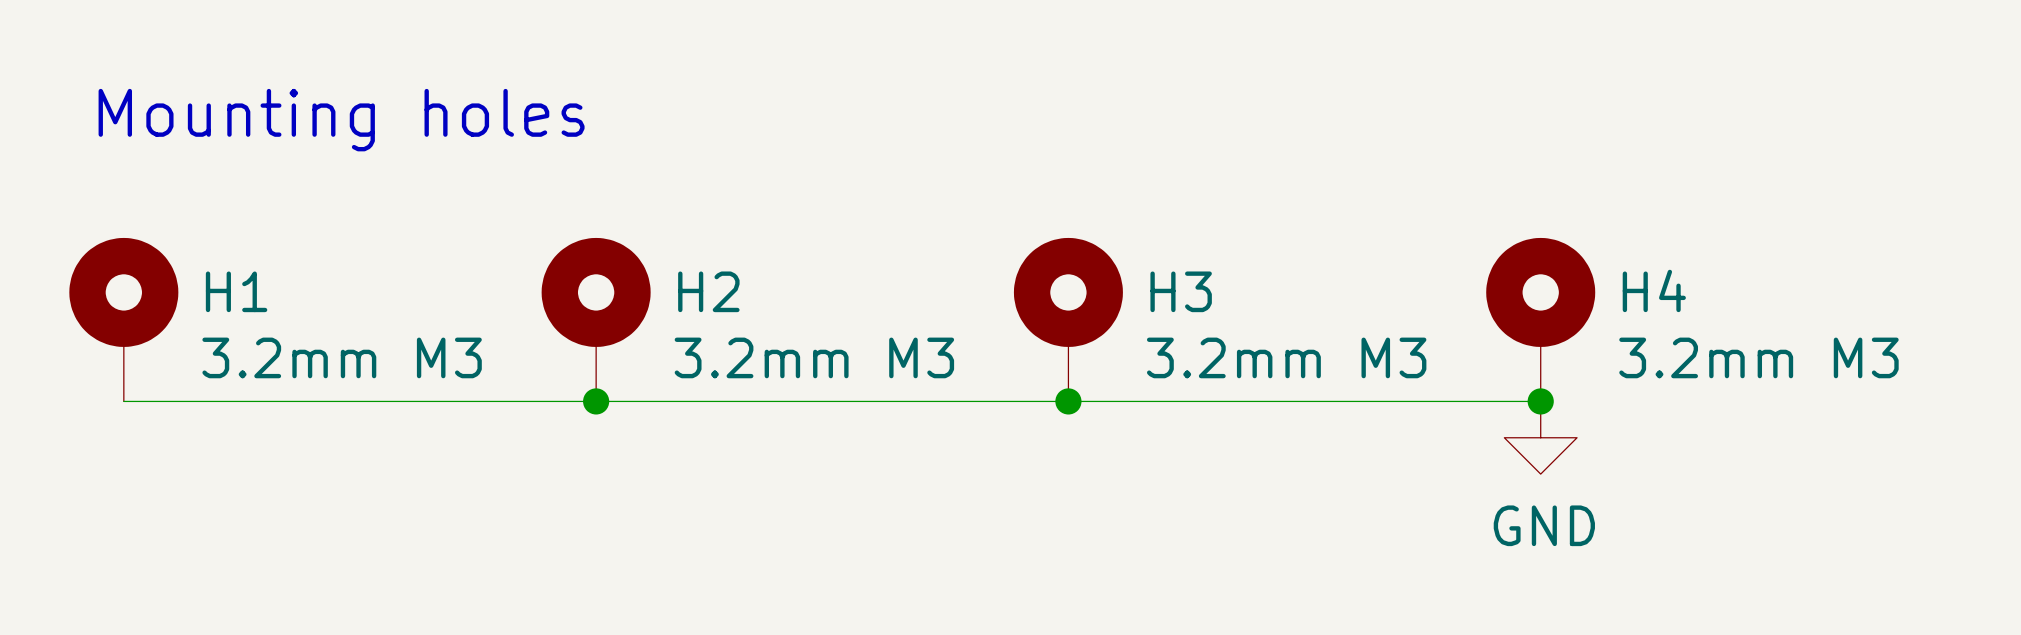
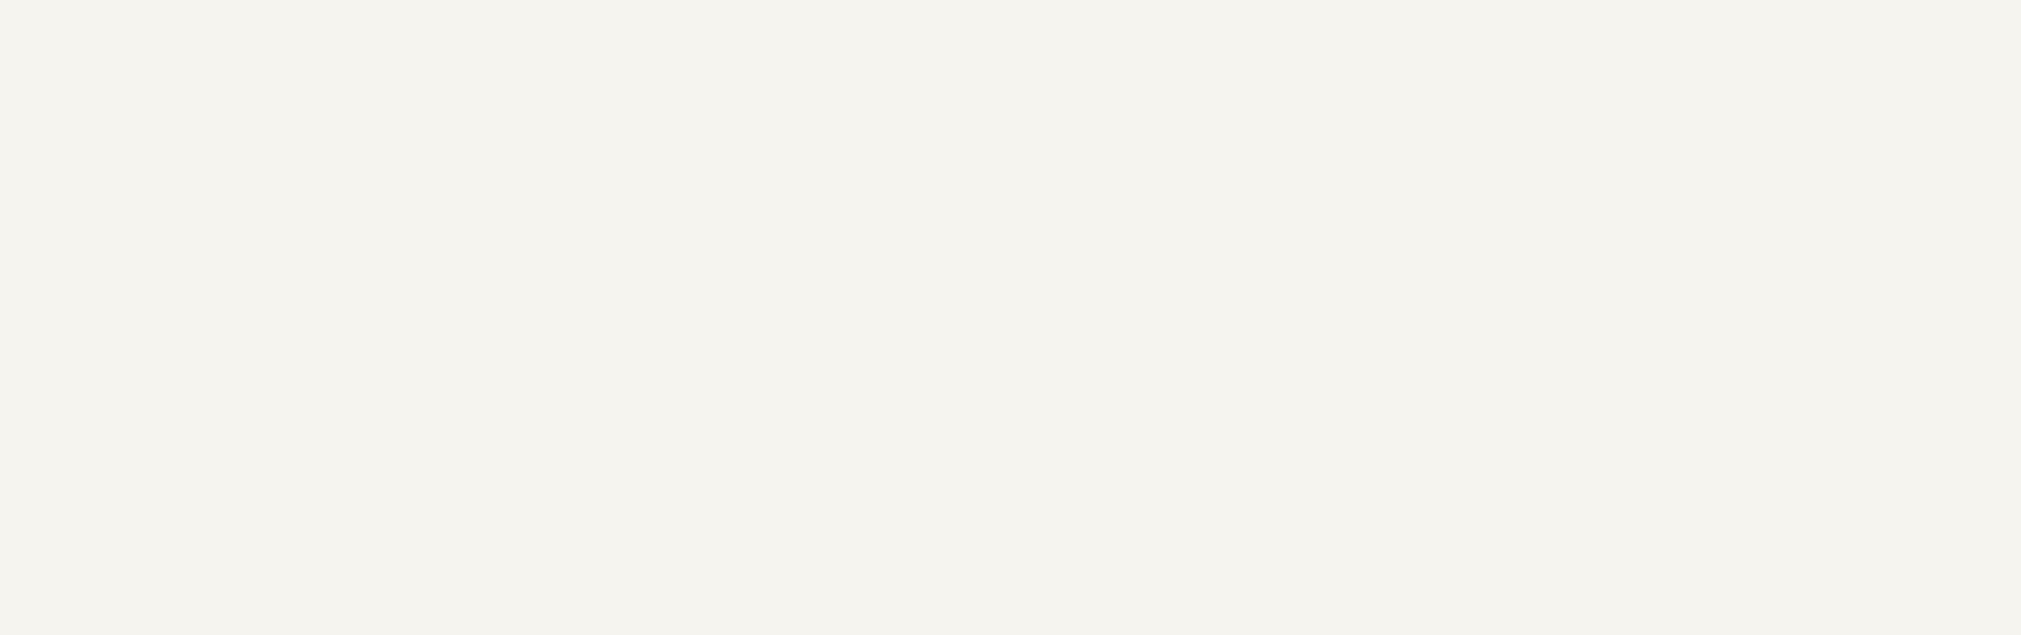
text: Mounting holes (341, 120) -> none
H1: 3.2mm M3 (123, 319) -> none
H2: 3.2mm M3 (596, 319) -> none
H3: 3.2mm M3 (1068, 319) -> none
H4: 3.2mm M3 (1540, 319) -> none
wire: (123, 401) (1540, 401) -> none
junction: (596, 401) -> none
junction: (1068, 401) -> none
junction: (1540, 401) -> none
power symbol: GND (1540, 437) -> none

